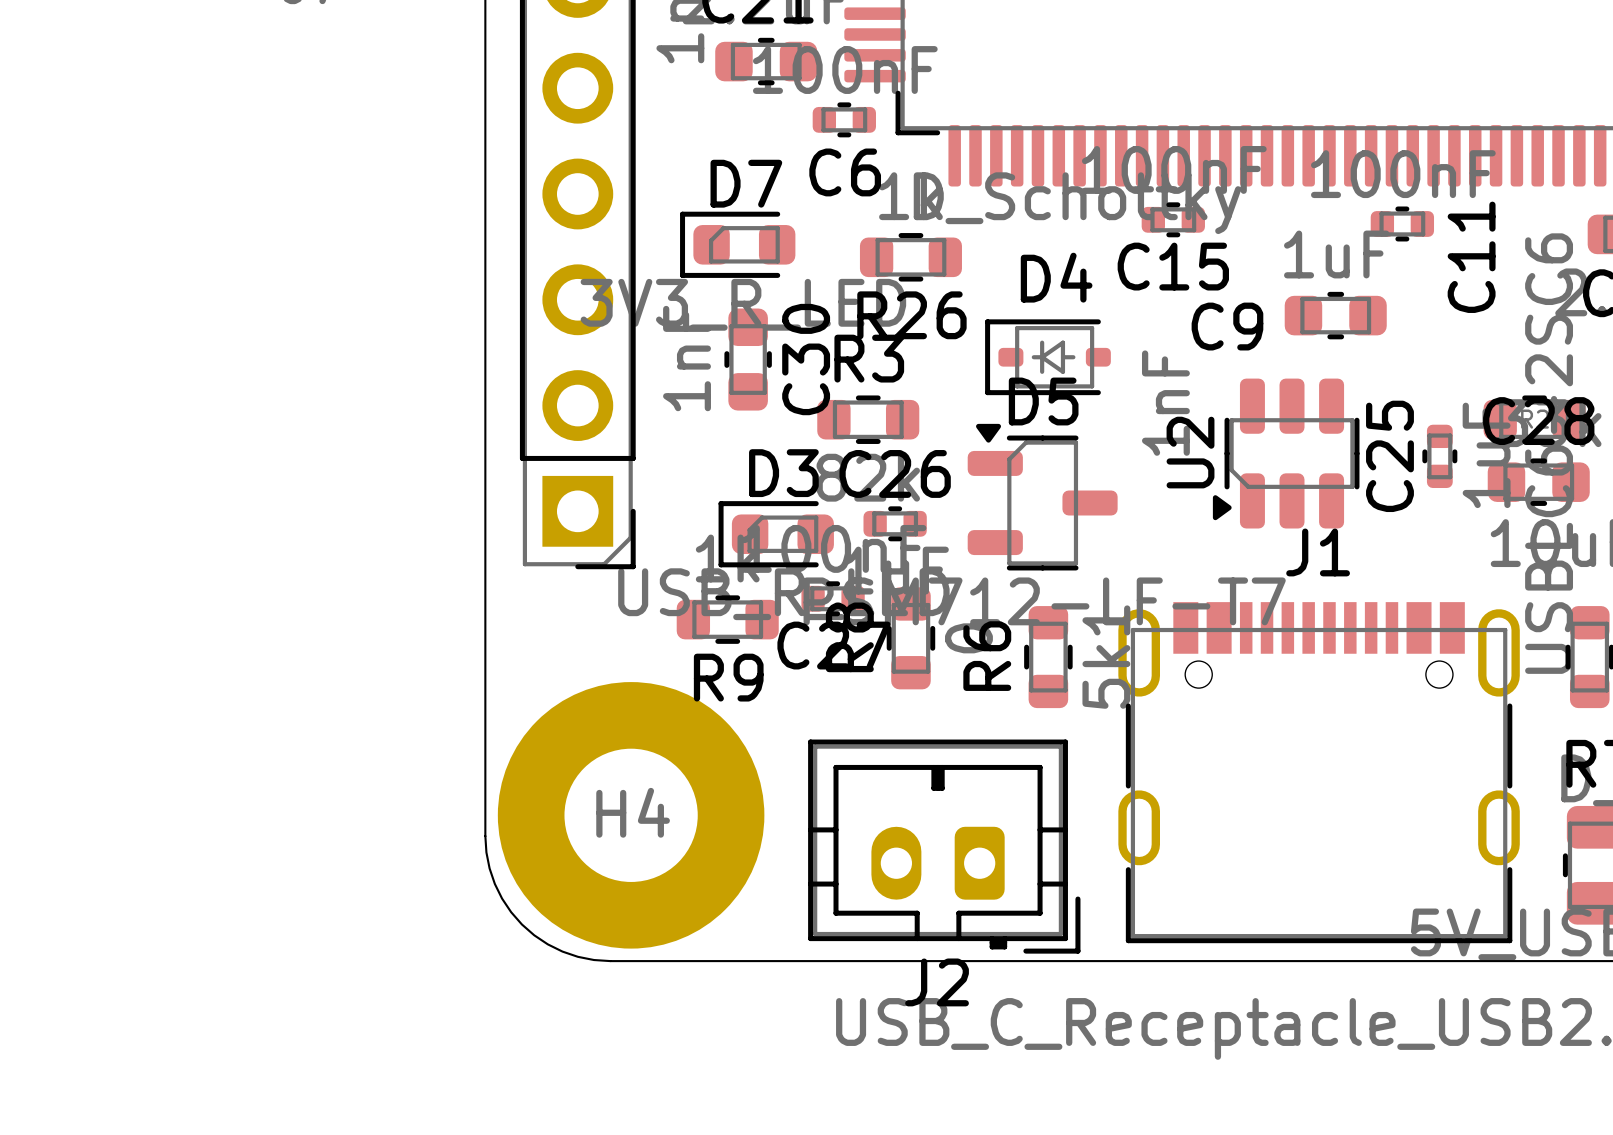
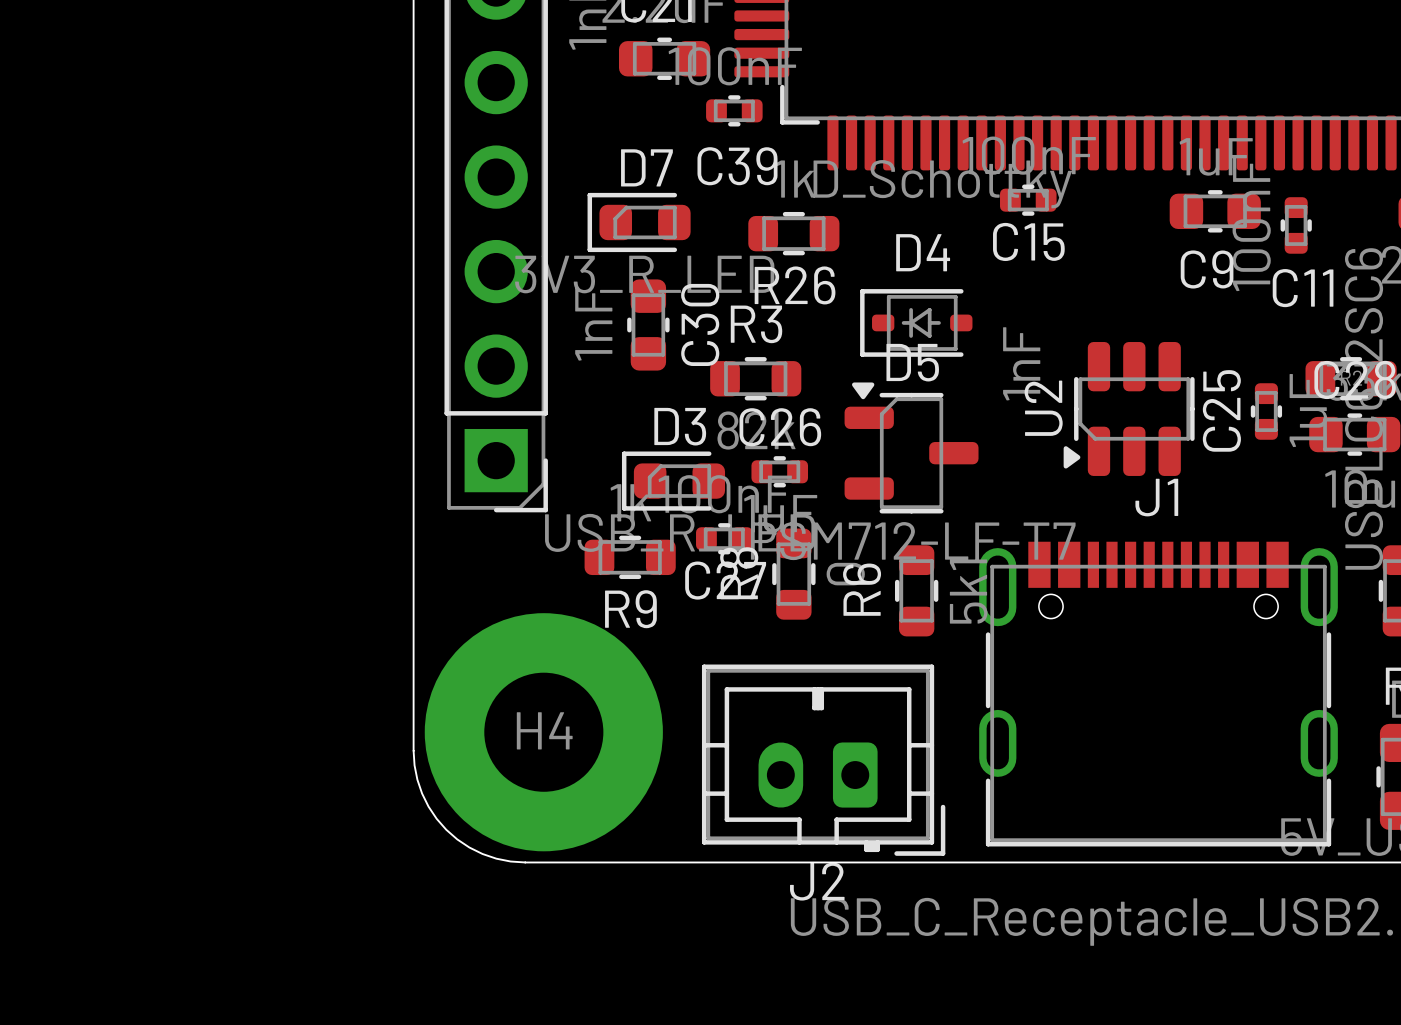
C6 name: C6 (845, 172) -> C39 (737, 166)
C11 rotation: 0° (1402, 223) -> 90° clockwise (1296, 225)
C11 position: (1402, 223) -> (1296, 225)
C9 position: (1335, 315) -> (1215, 211)
C9 name position: C9 (1227, 326) -> C9 (1207, 269)

